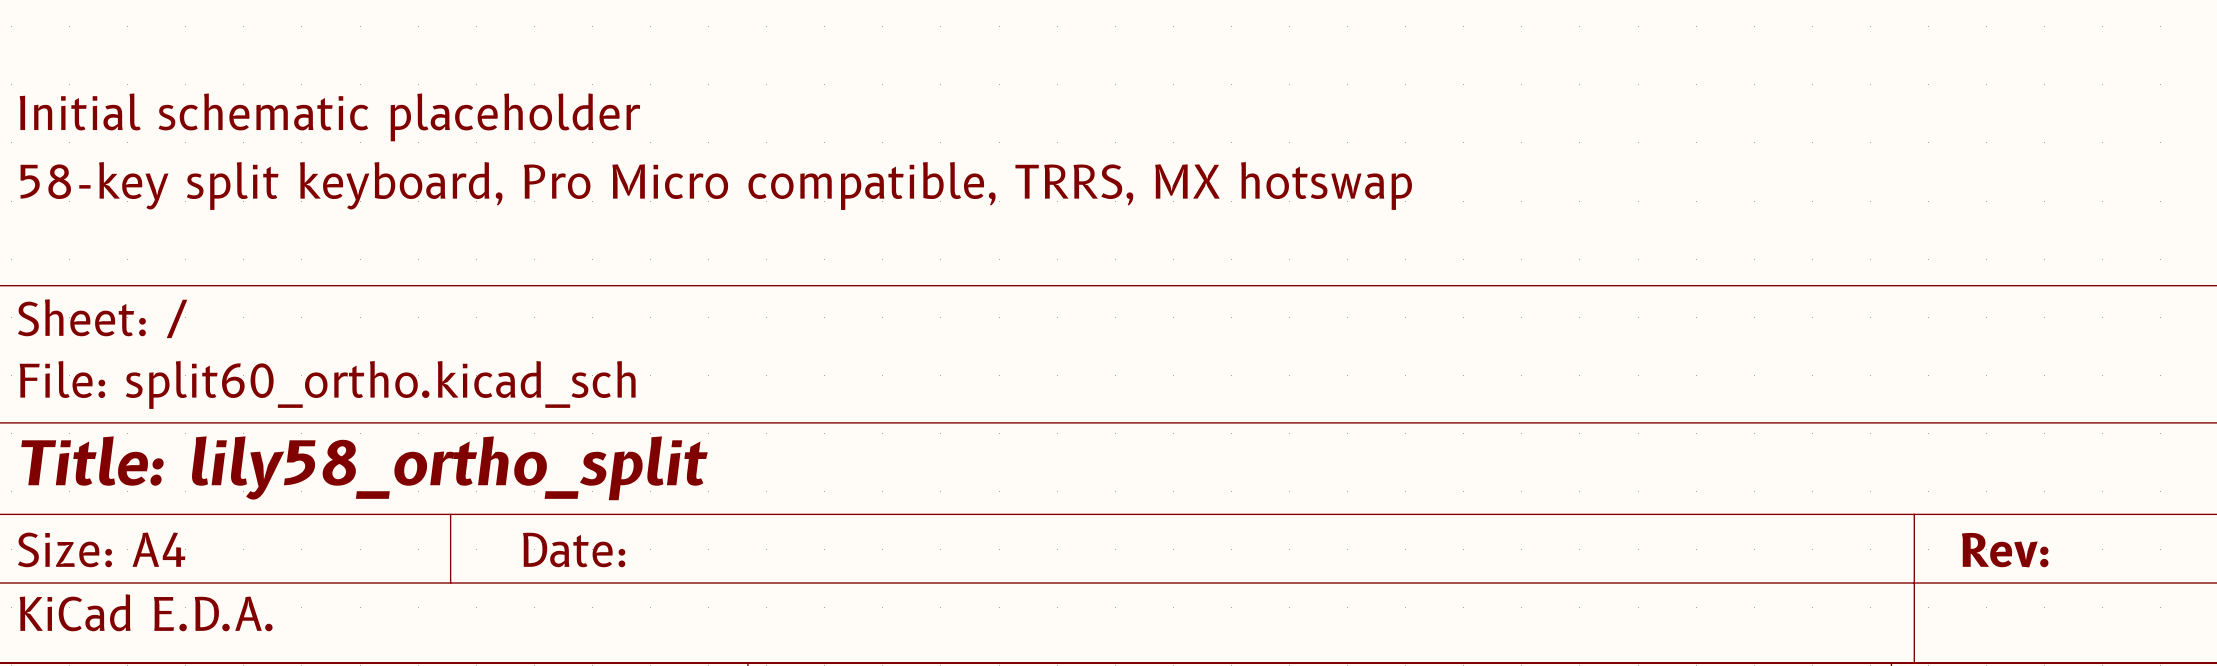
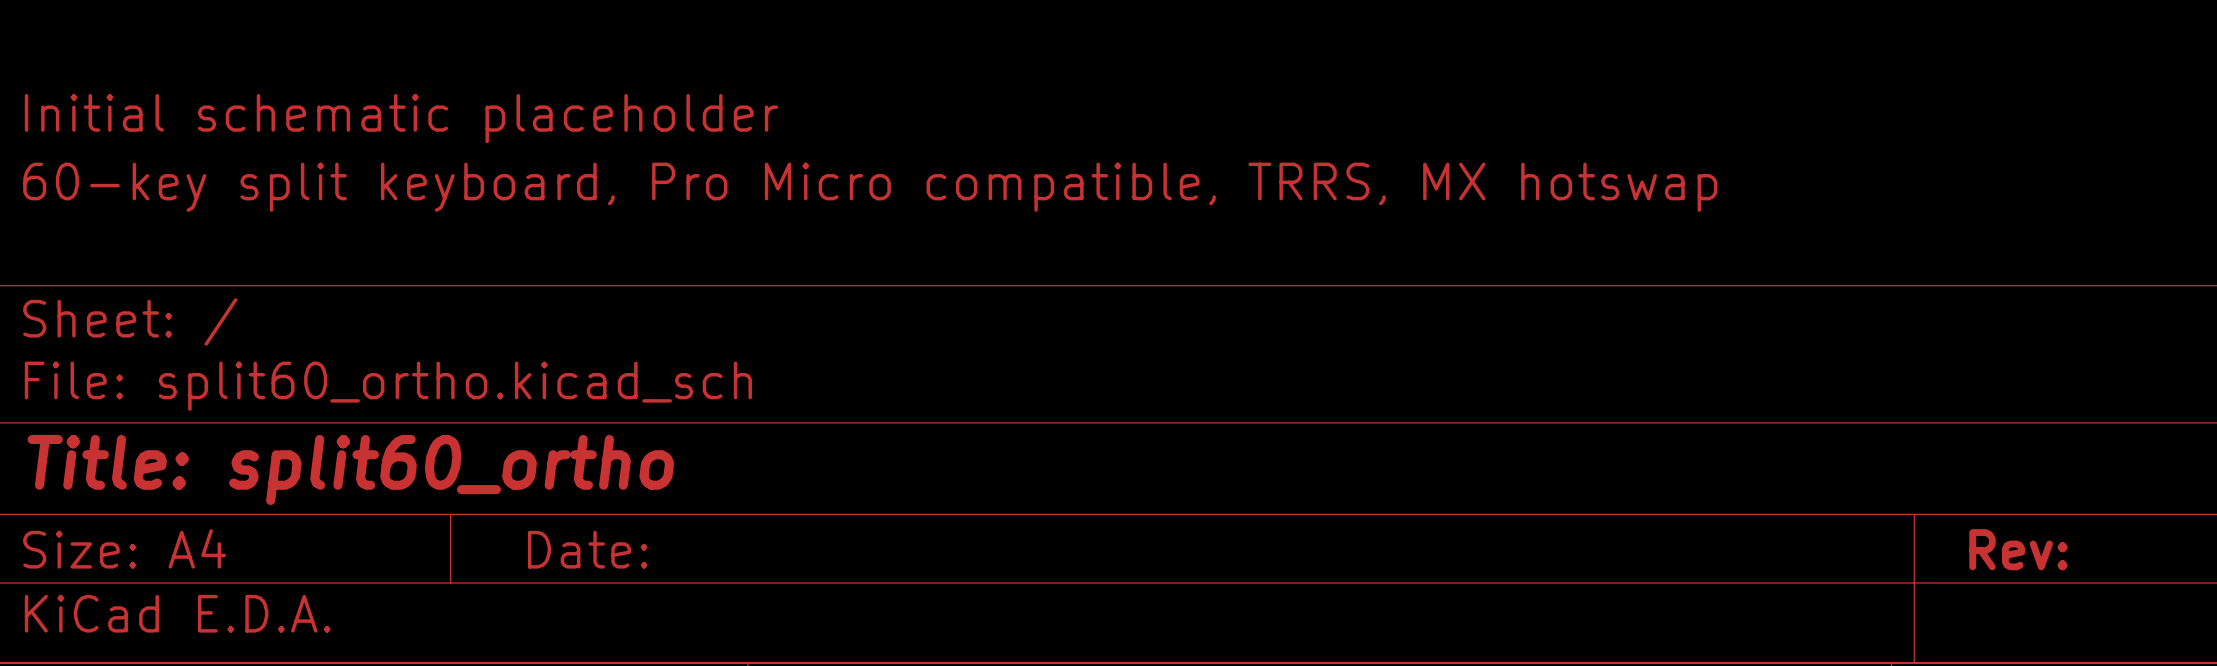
title block: 58-key split keyboard, Pro Micro compatible, TRRS, MX hotswap (716, 186) -> 60-key split keyboard, Pro Micro compatible, TRRS, MX hotswap (870, 187)
title block: Title: lily58_ortho_split (364, 468) -> Title: split60_ortho (350, 469)

